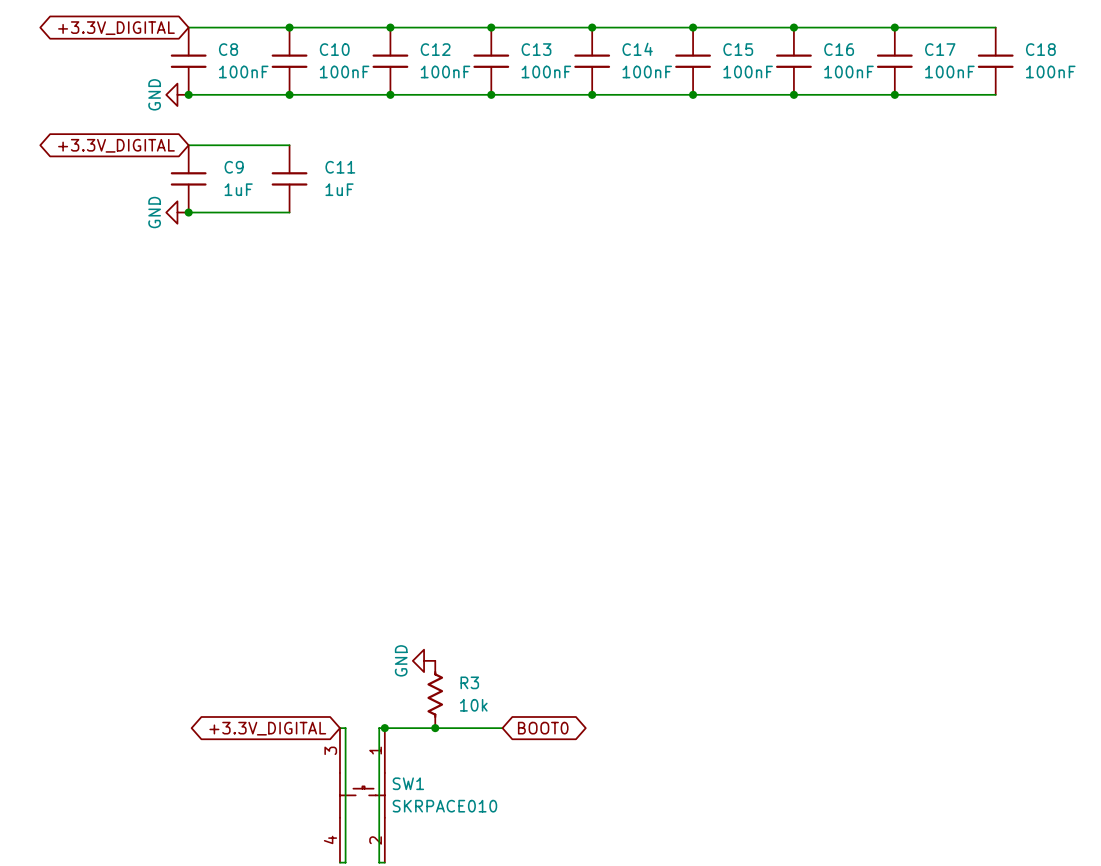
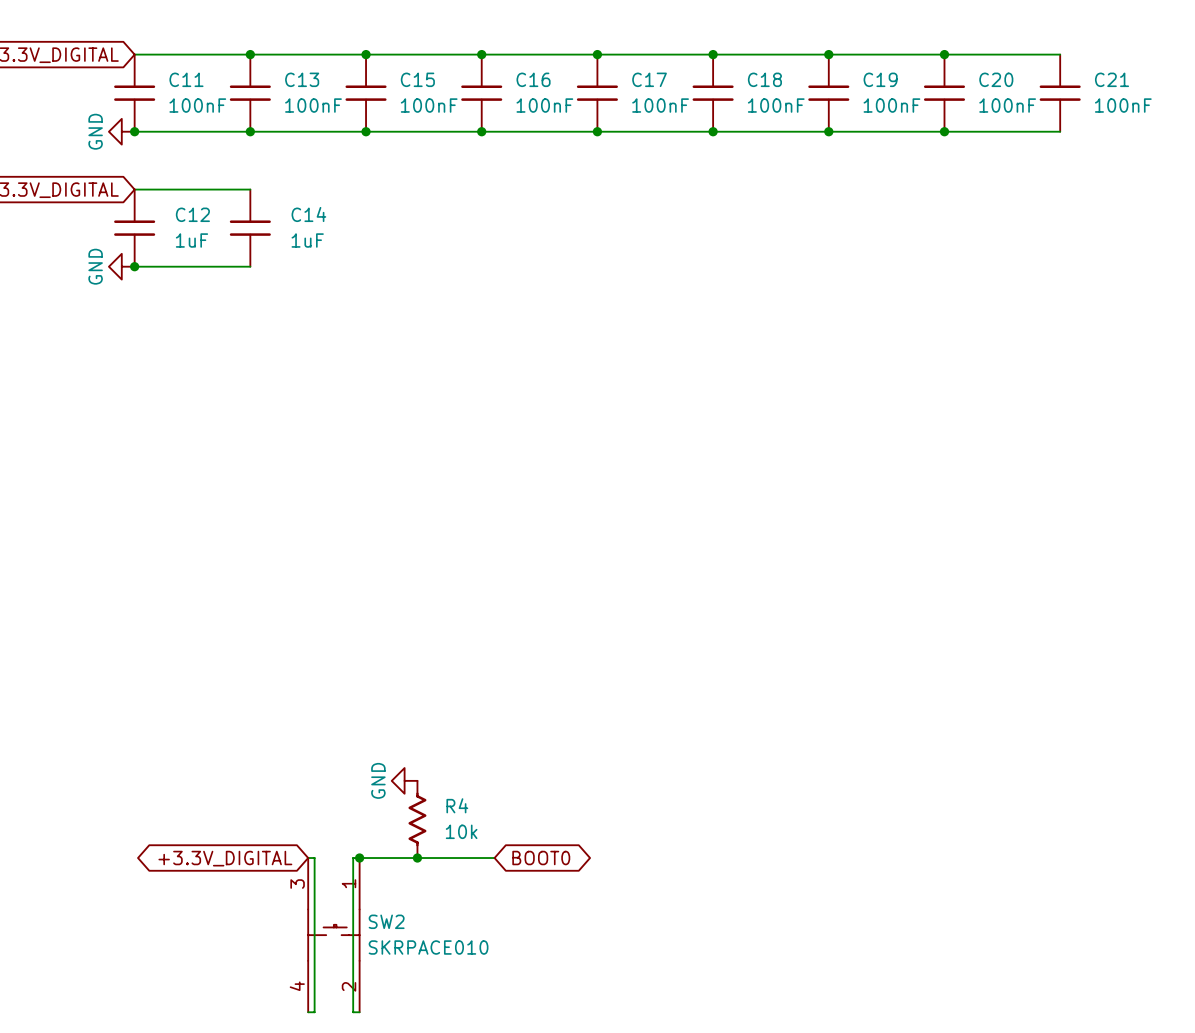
C8 name: C8 (228, 49) -> C11 (186, 79)
C10 name: C10 (334, 49) -> C13 (302, 79)
C12 name: C12 (435, 49) -> C15 (417, 79)
C13 name: C13 (536, 49) -> C16 (533, 79)
C14 name: C14 (637, 49) -> C17 (649, 79)
C15 name: C15 (738, 49) -> C18 (764, 79)
C16 name: C16 (839, 49) -> C19 (880, 79)
C17 name: C17 (940, 49) -> C20 (996, 79)
C18 name: C18 (1040, 49) -> C21 (1112, 79)
C9 name: C9 (234, 167) -> C12 (192, 214)
C11 name: C11 (340, 167) -> C14 (308, 214)
R3 name: R3 (469, 682) -> R4 (457, 805)
SW1 name: SW1 (408, 783) -> SW2 (386, 921)

